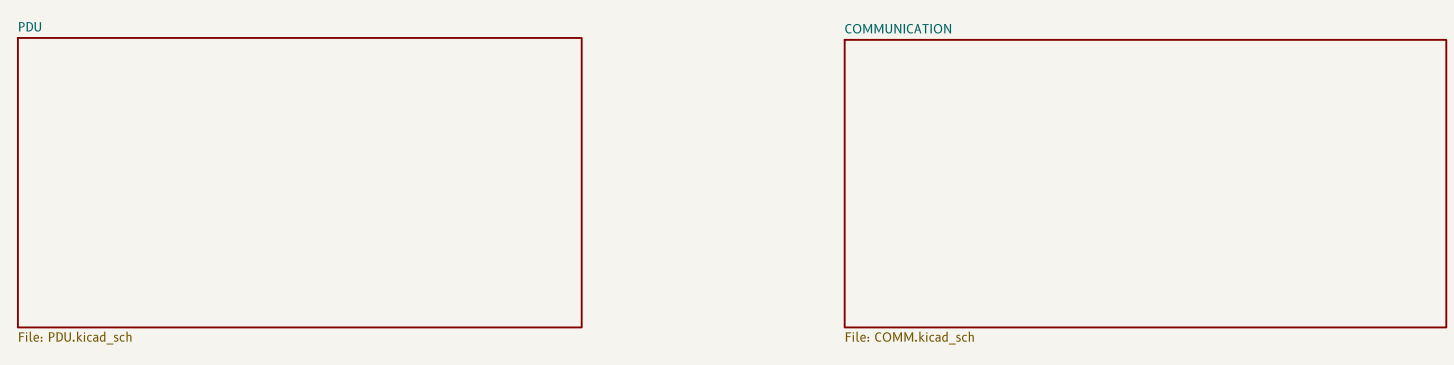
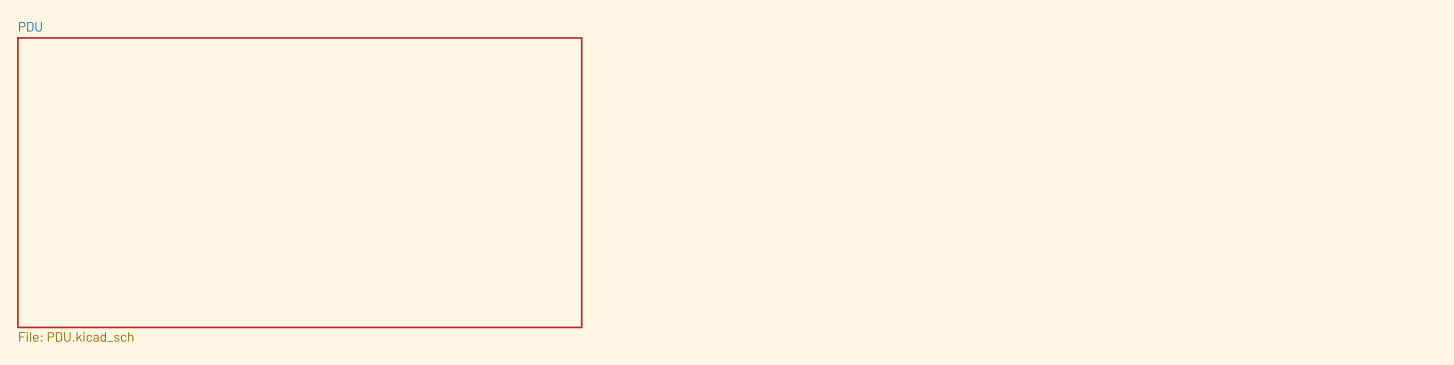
sheet COMMUNICATION: File: COMM.kicad_sch (1145, 183) -> none

